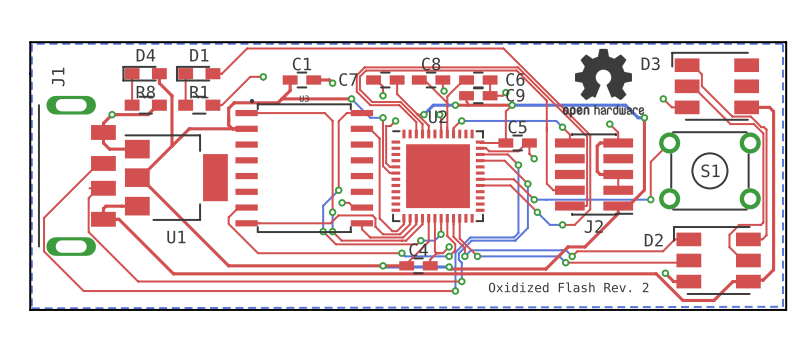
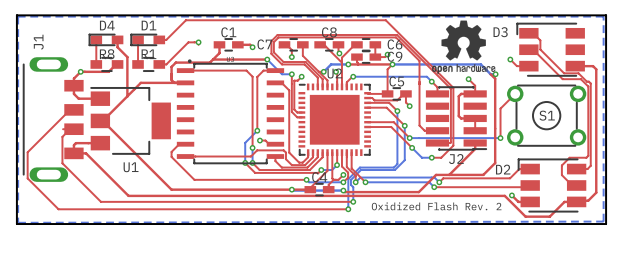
top track: none -> (490, 74) (495, 78) (495, 163) (483, 174) (449, 174)
top track: (644, 117) (644, 190) (628, 205) -> none

